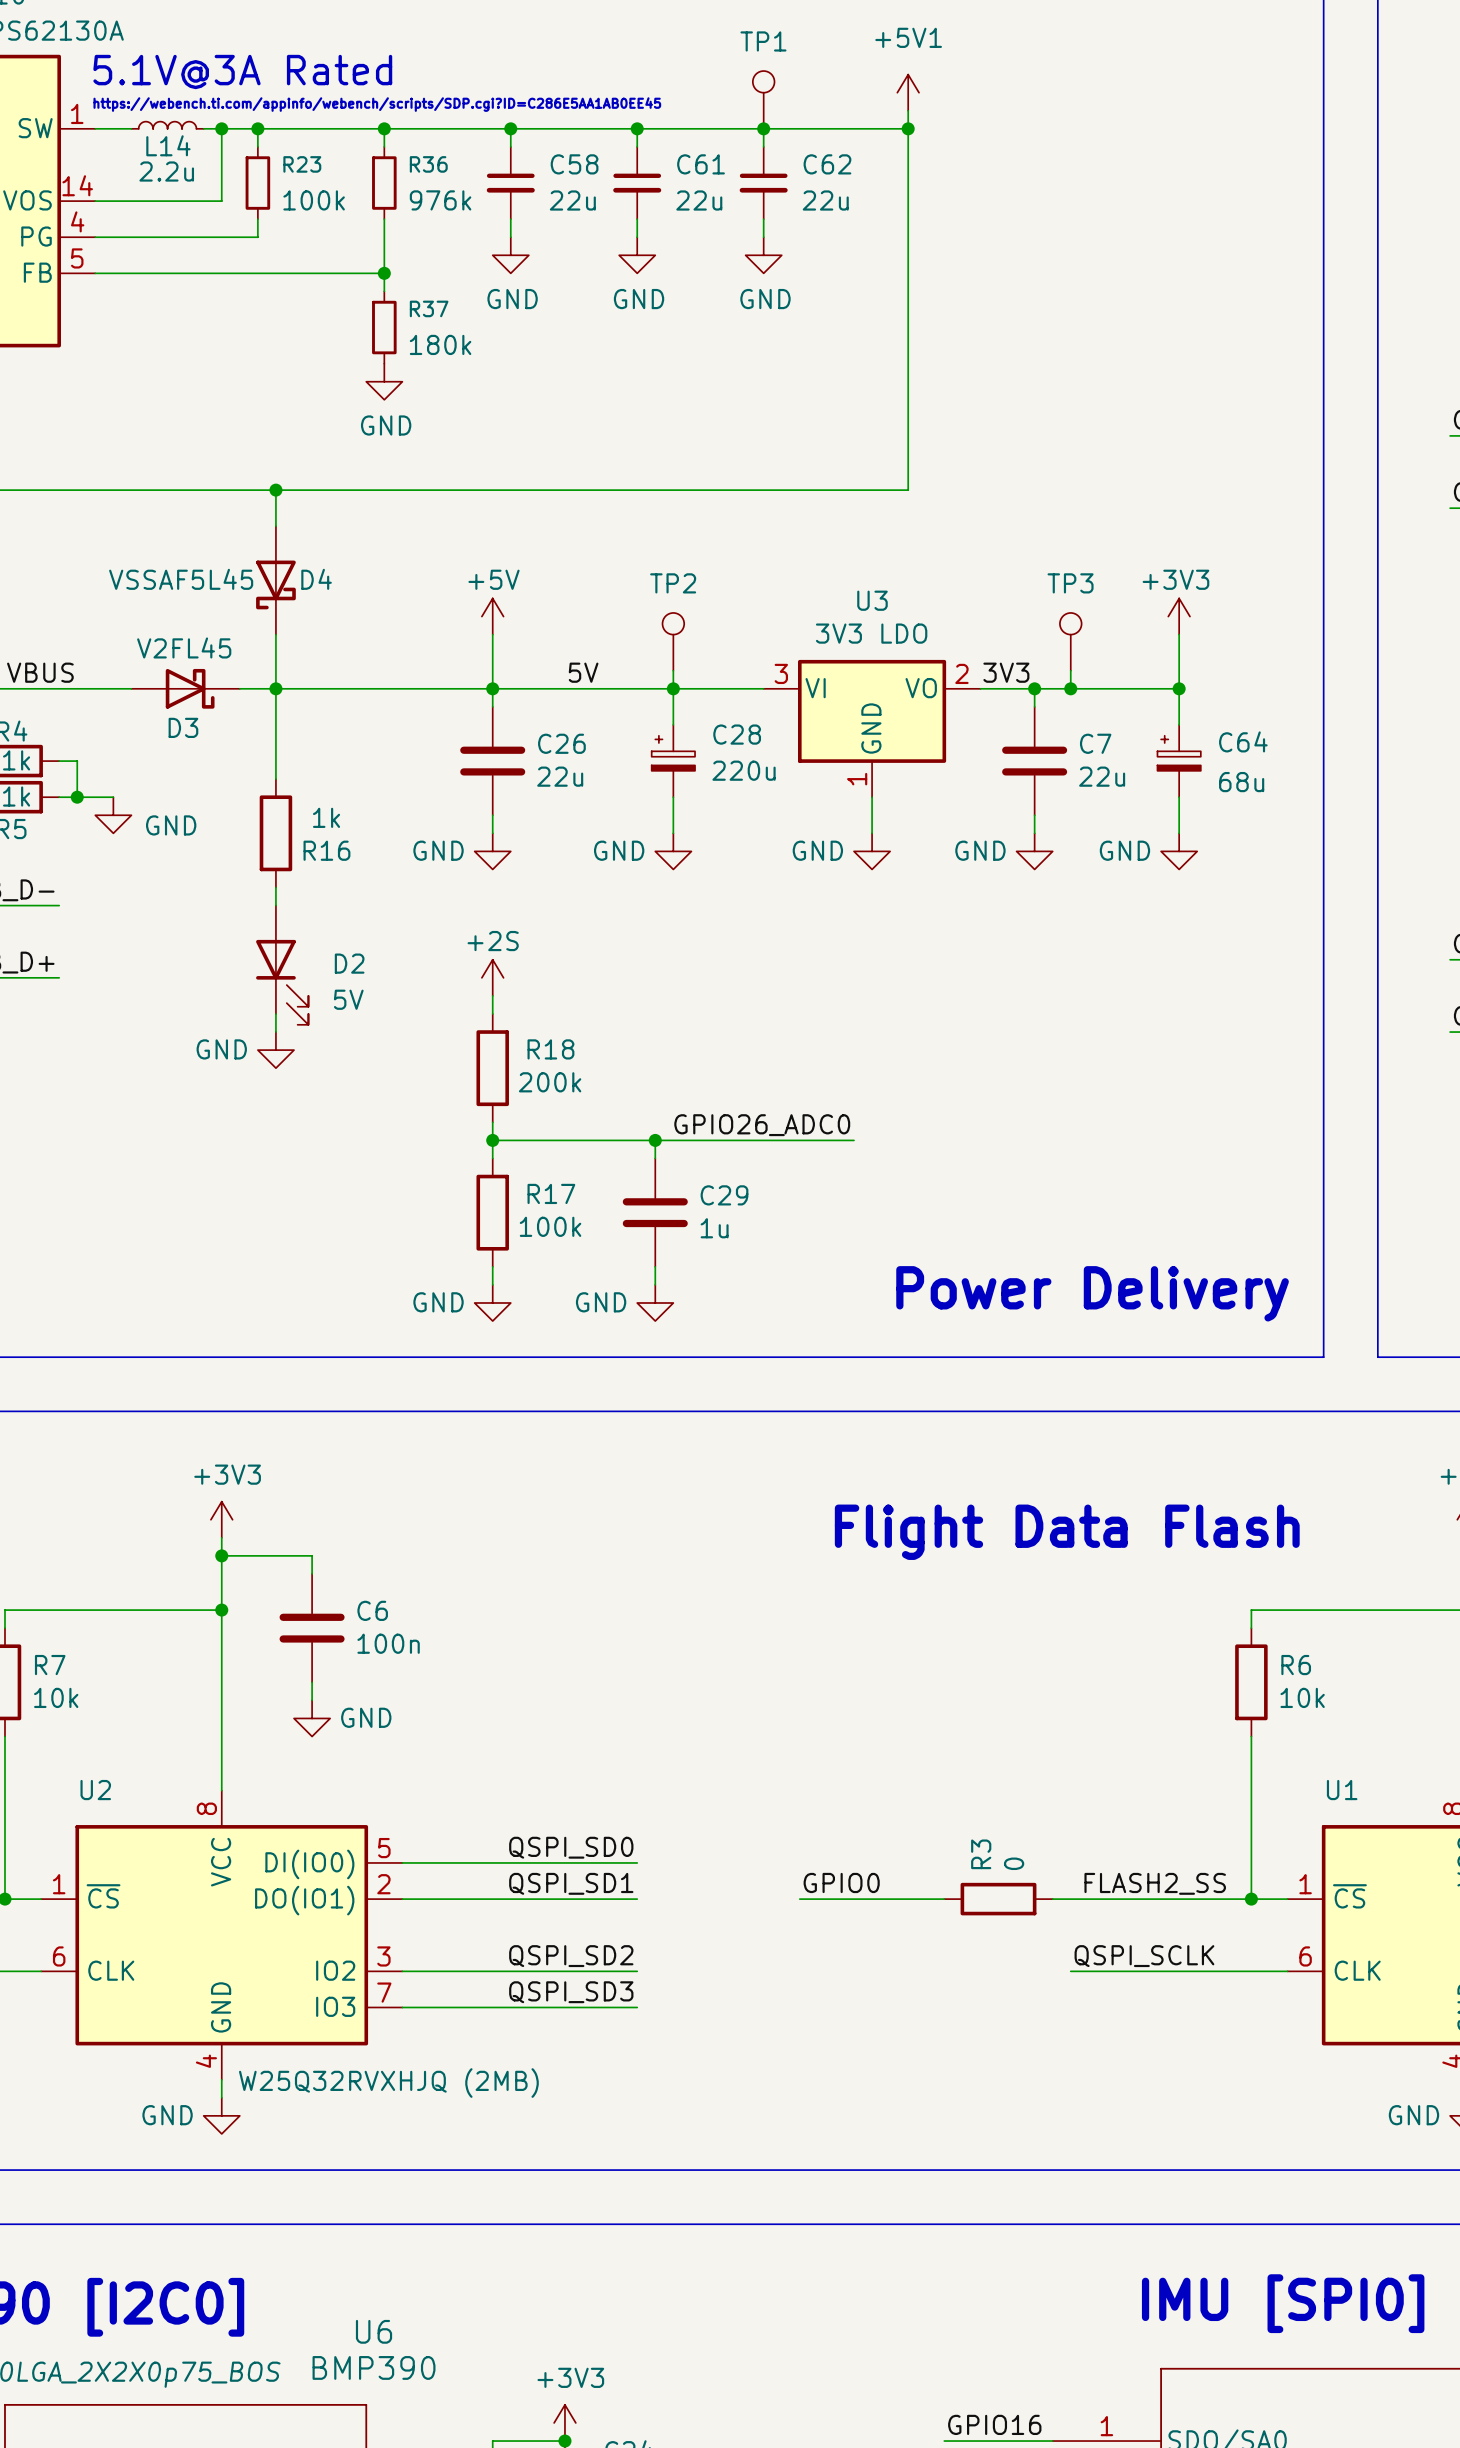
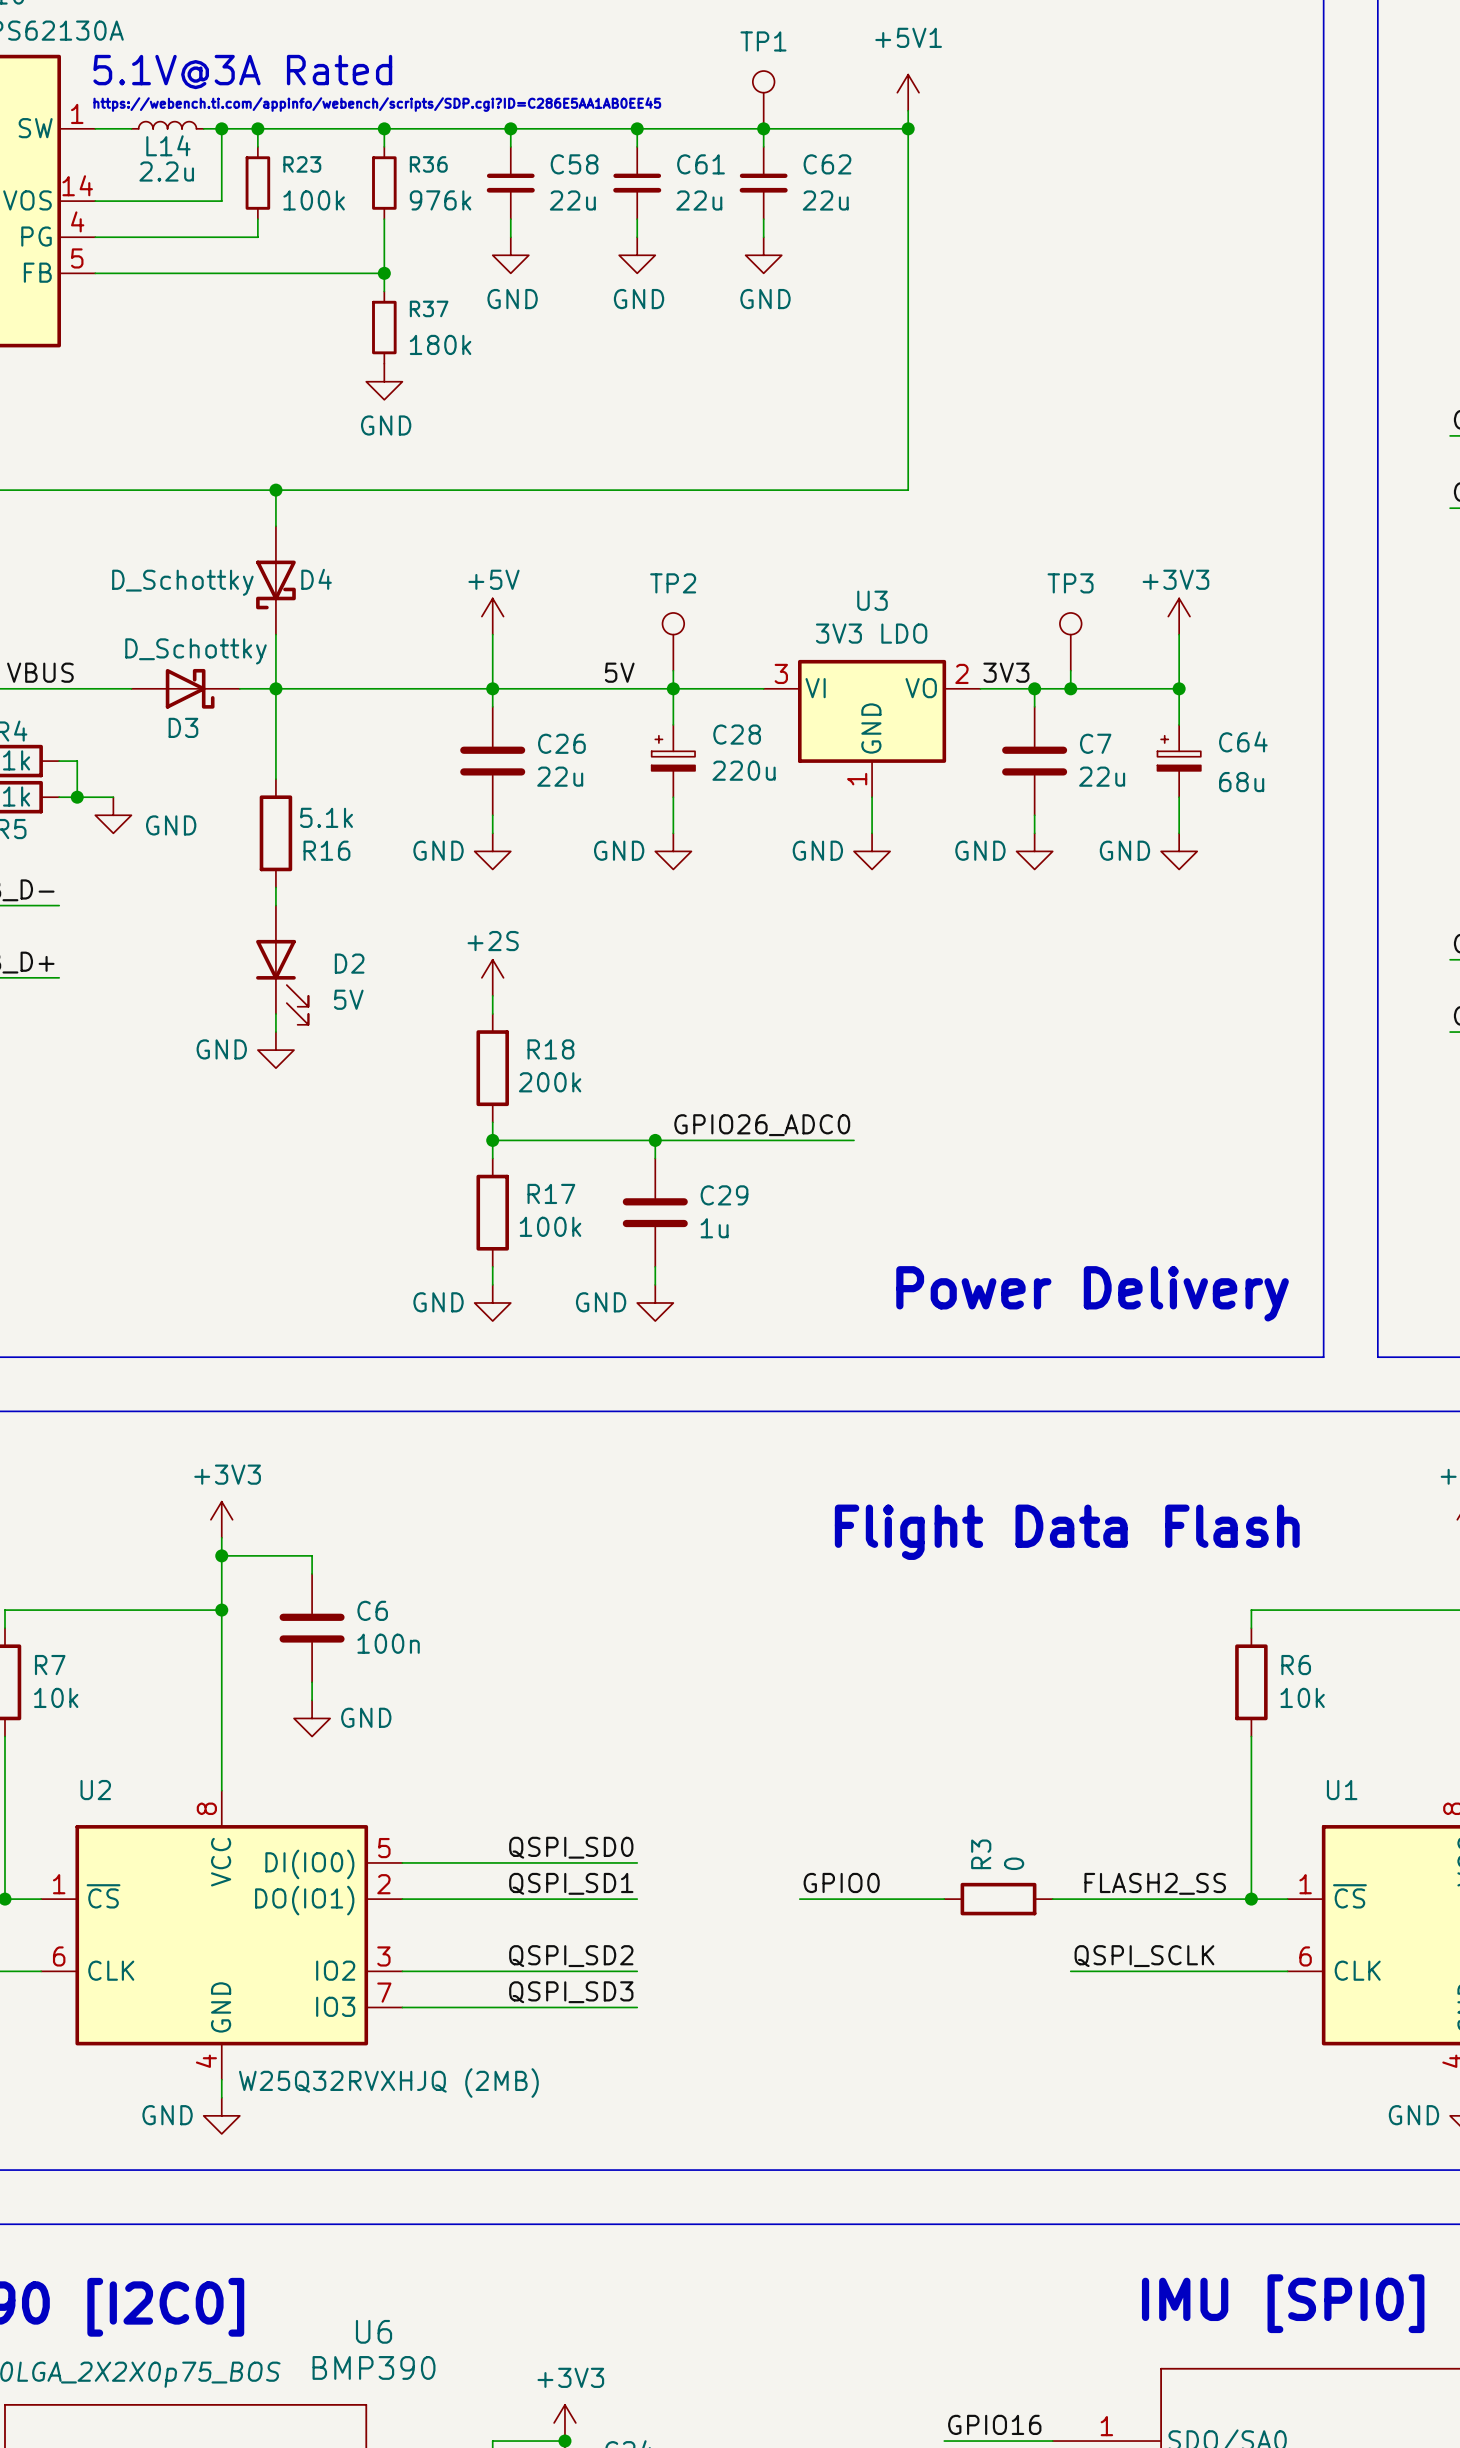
D4 value: VSSAF5L45 (181, 579) -> D_Schottky (182, 582)
D3 value: V2FL45 (184, 647) -> D_Schottky (196, 651)
label position: 5V (583, 672) -> 5V (619, 672)
R16 value: 1k (326, 817) -> 5.1k (326, 817)

